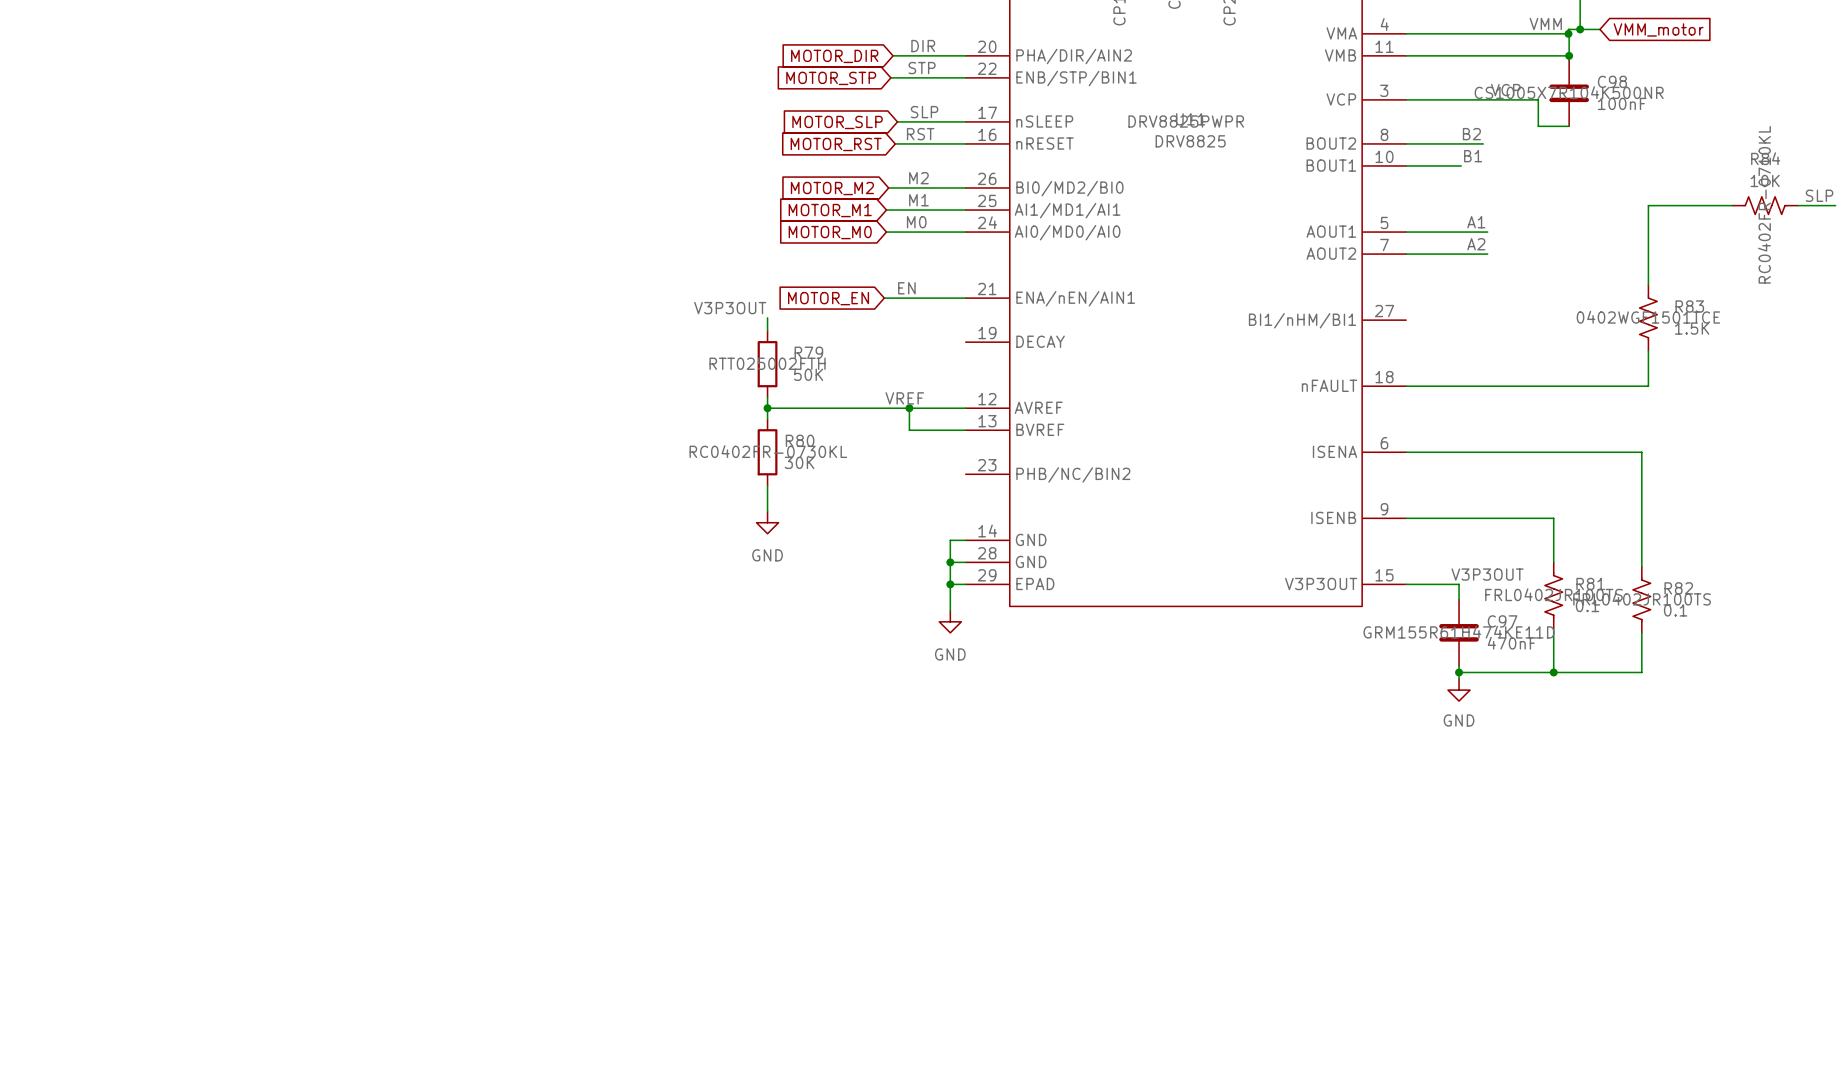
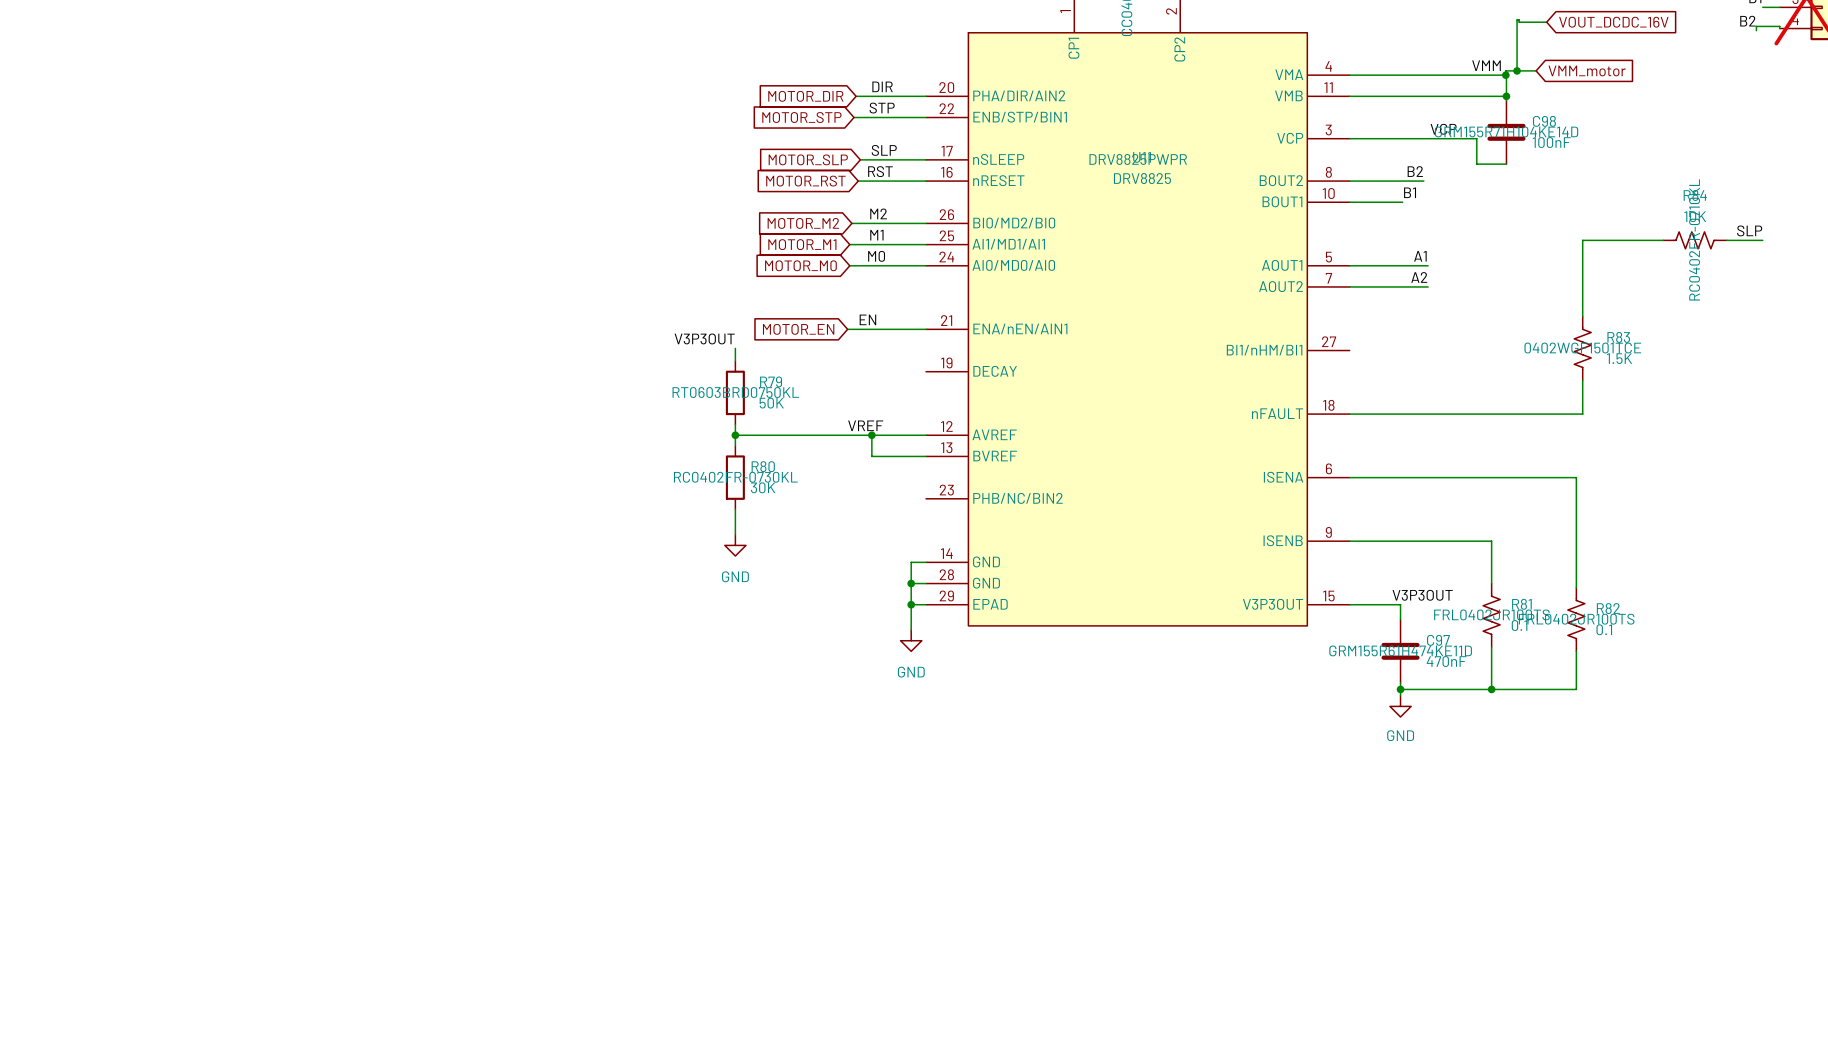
C98 text: CS1005X7R104K500NR (1569, 92) -> GRM155R71H104KE14D (1506, 131)
R79 text: RTT025002FTH (767, 363) -> RT0603BRD0750KL (735, 392)

